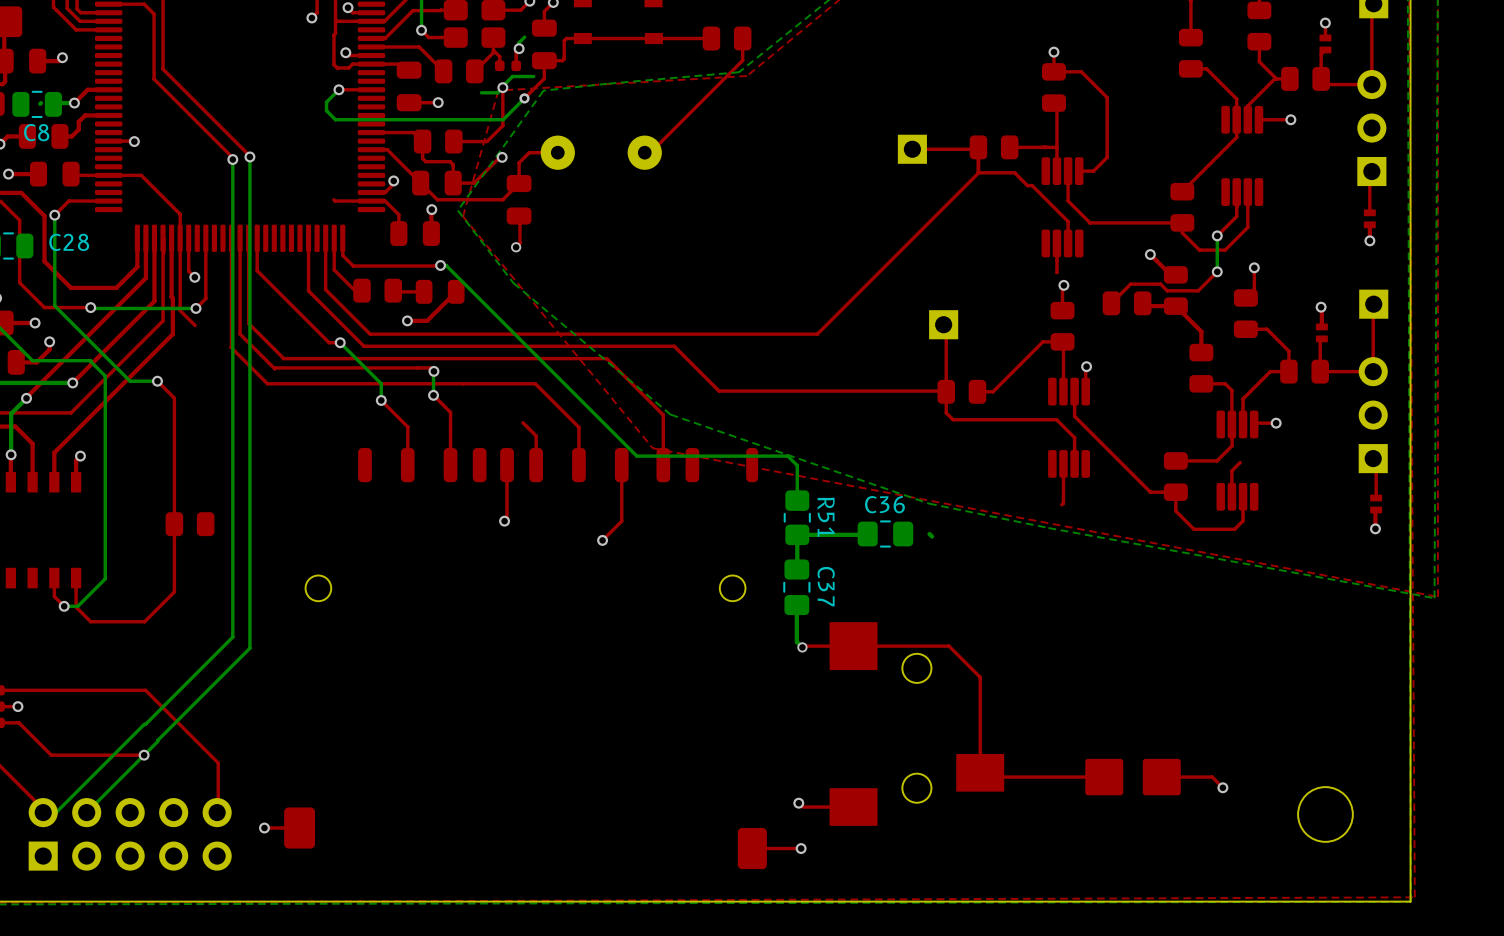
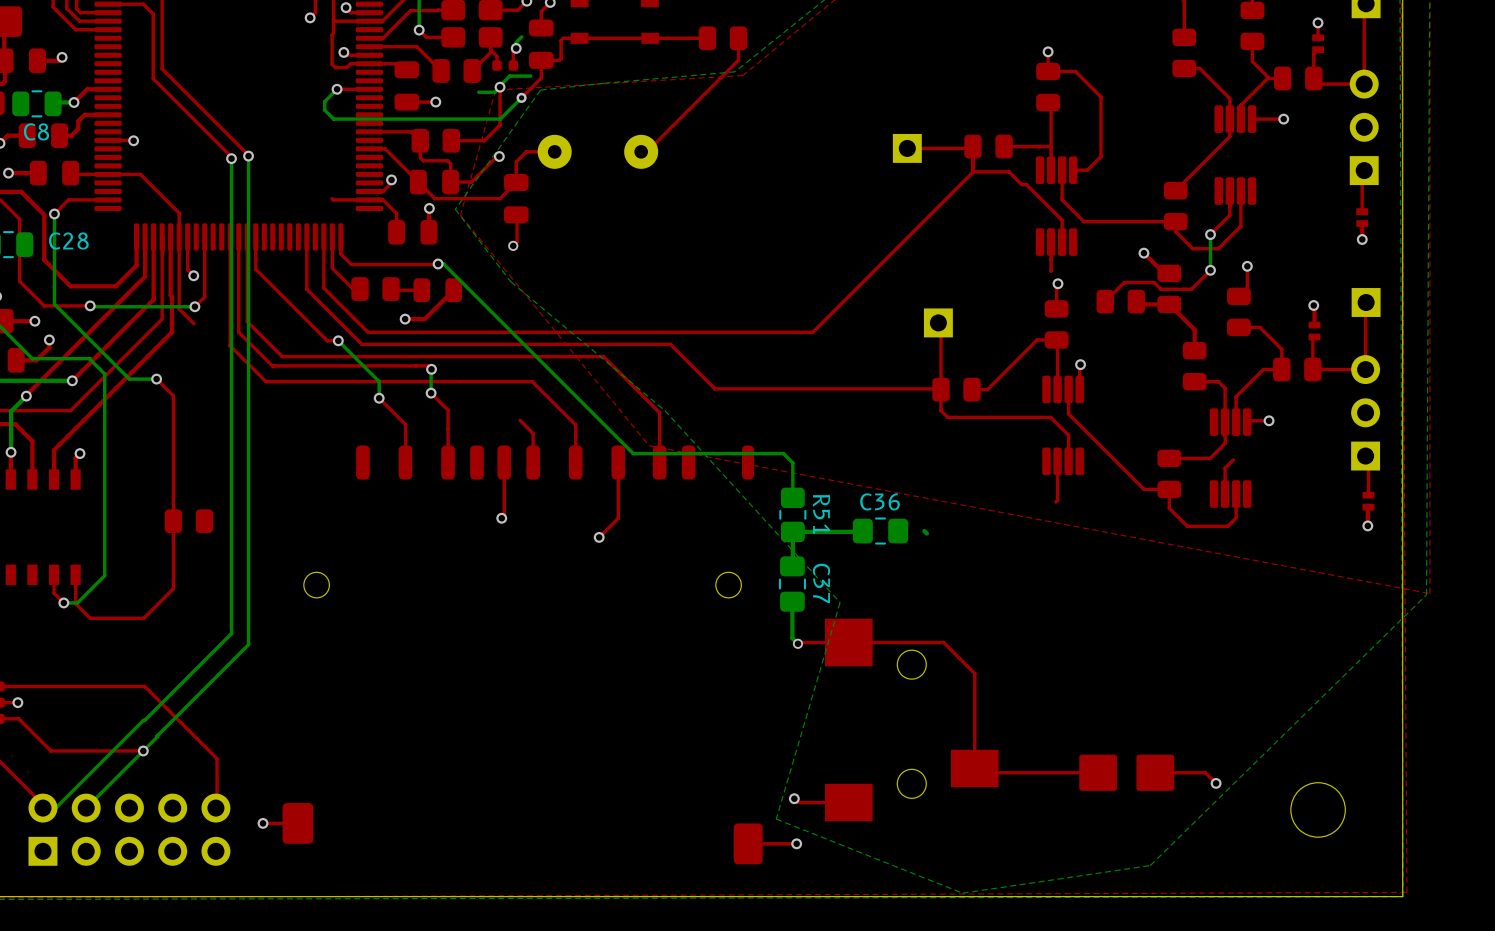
bottom track: (41, 103) (40, 103) -> none
bottom zone outline: (668, 412) (929, 503) (1048, 528) (1434, 598) -> (664, 410) (840, 602) (776, 819) (962, 893) (1150, 865) (1426, 594)

